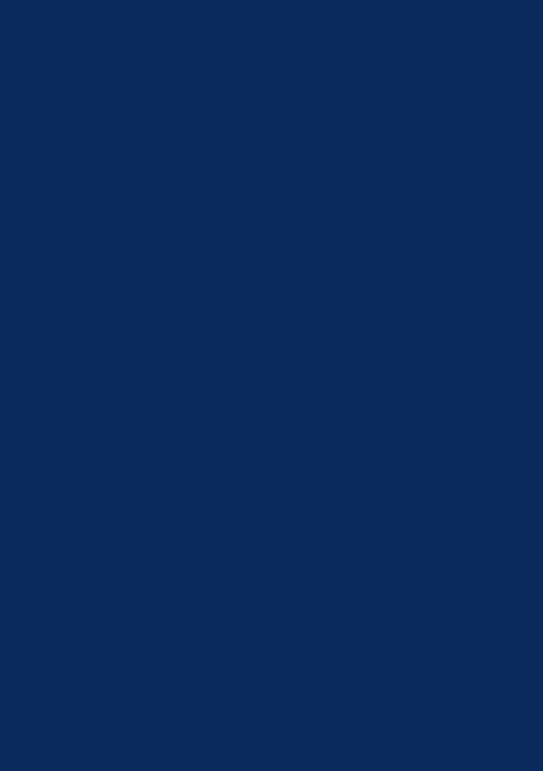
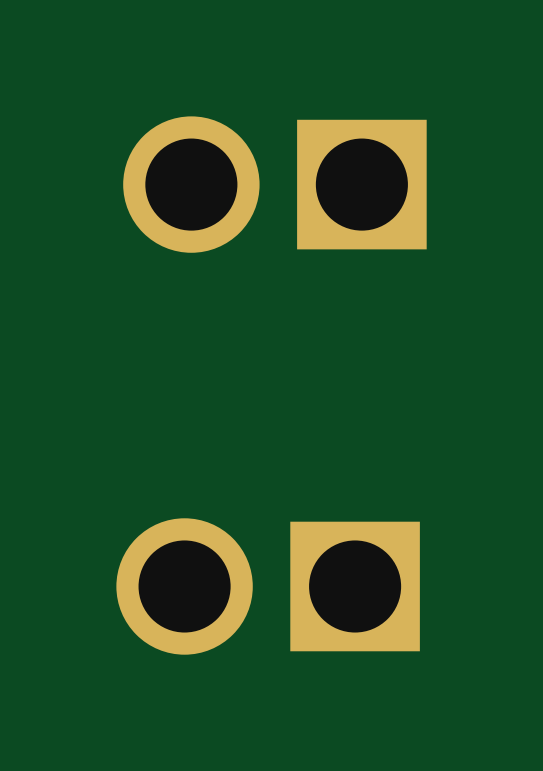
part: none -> (274, 184)
part: none -> (268, 586)

